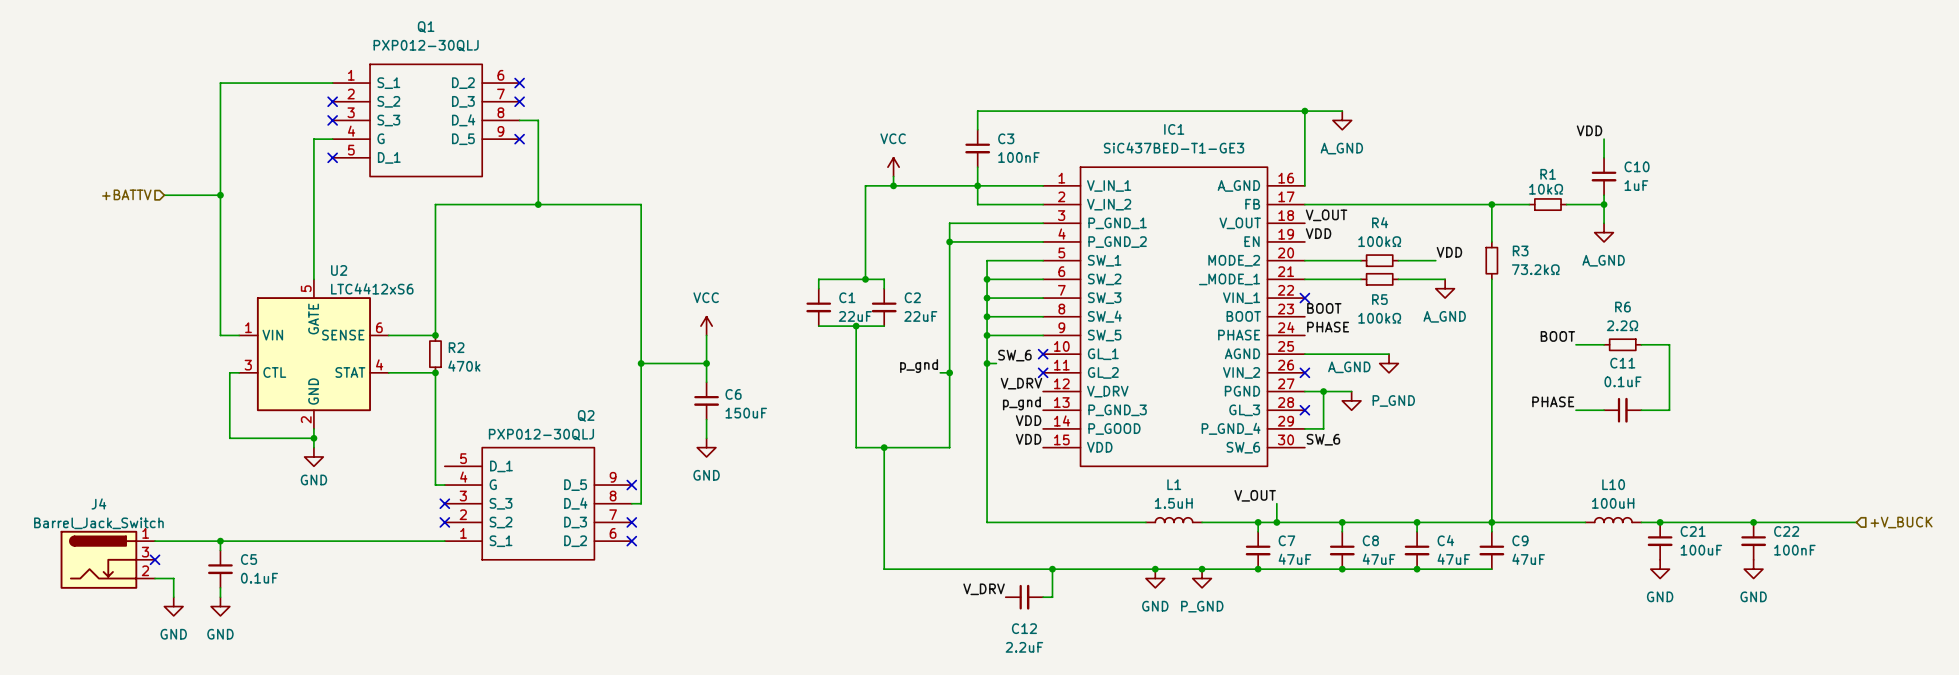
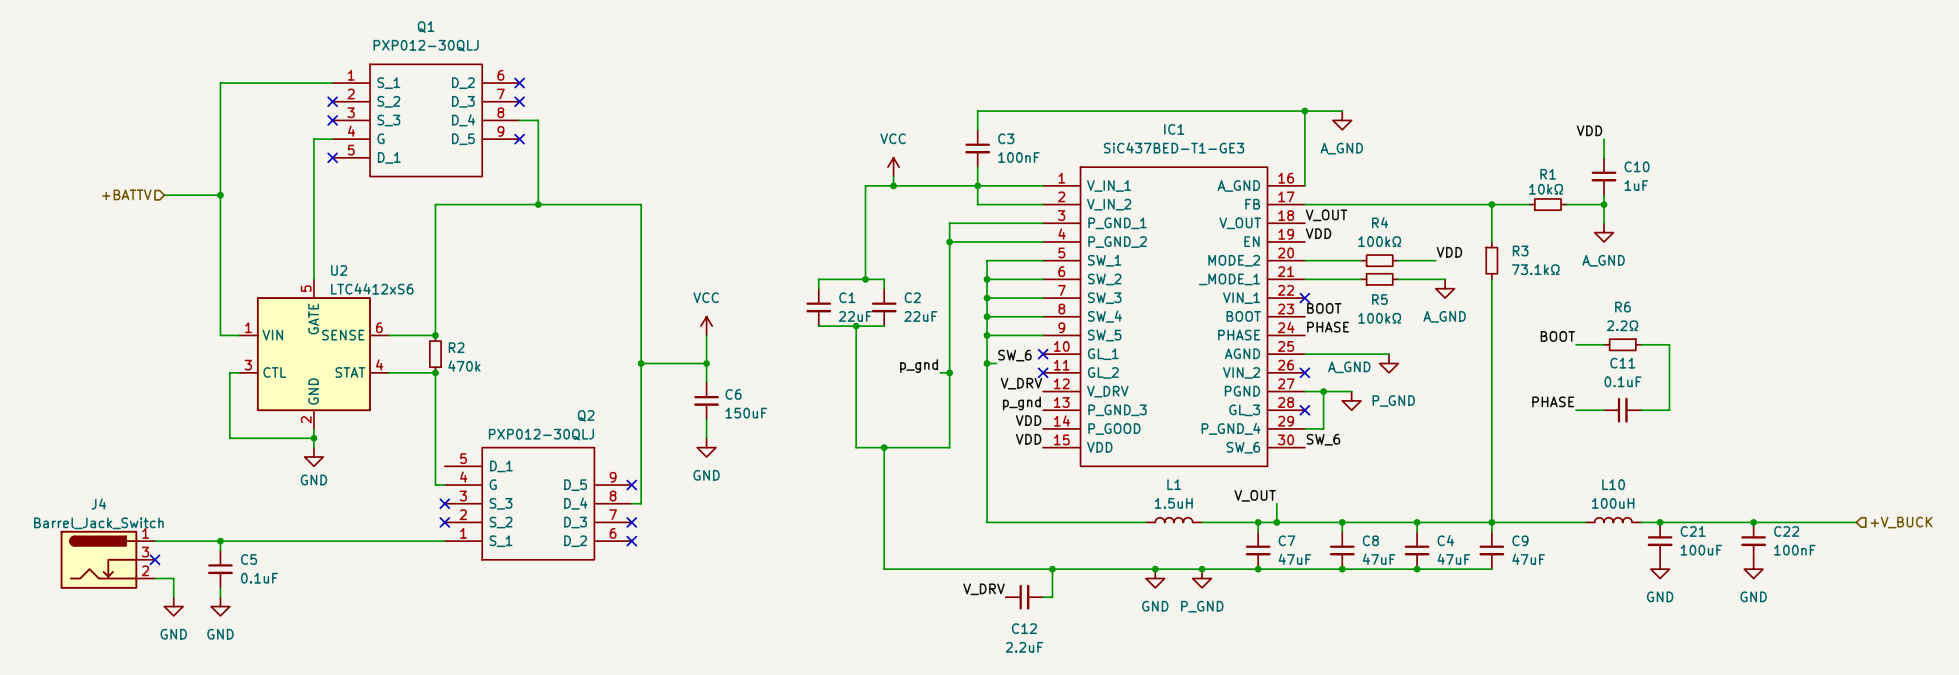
R3 value: 73.2kΩ (1535, 269) -> 73.1kΩ (1535, 269)

